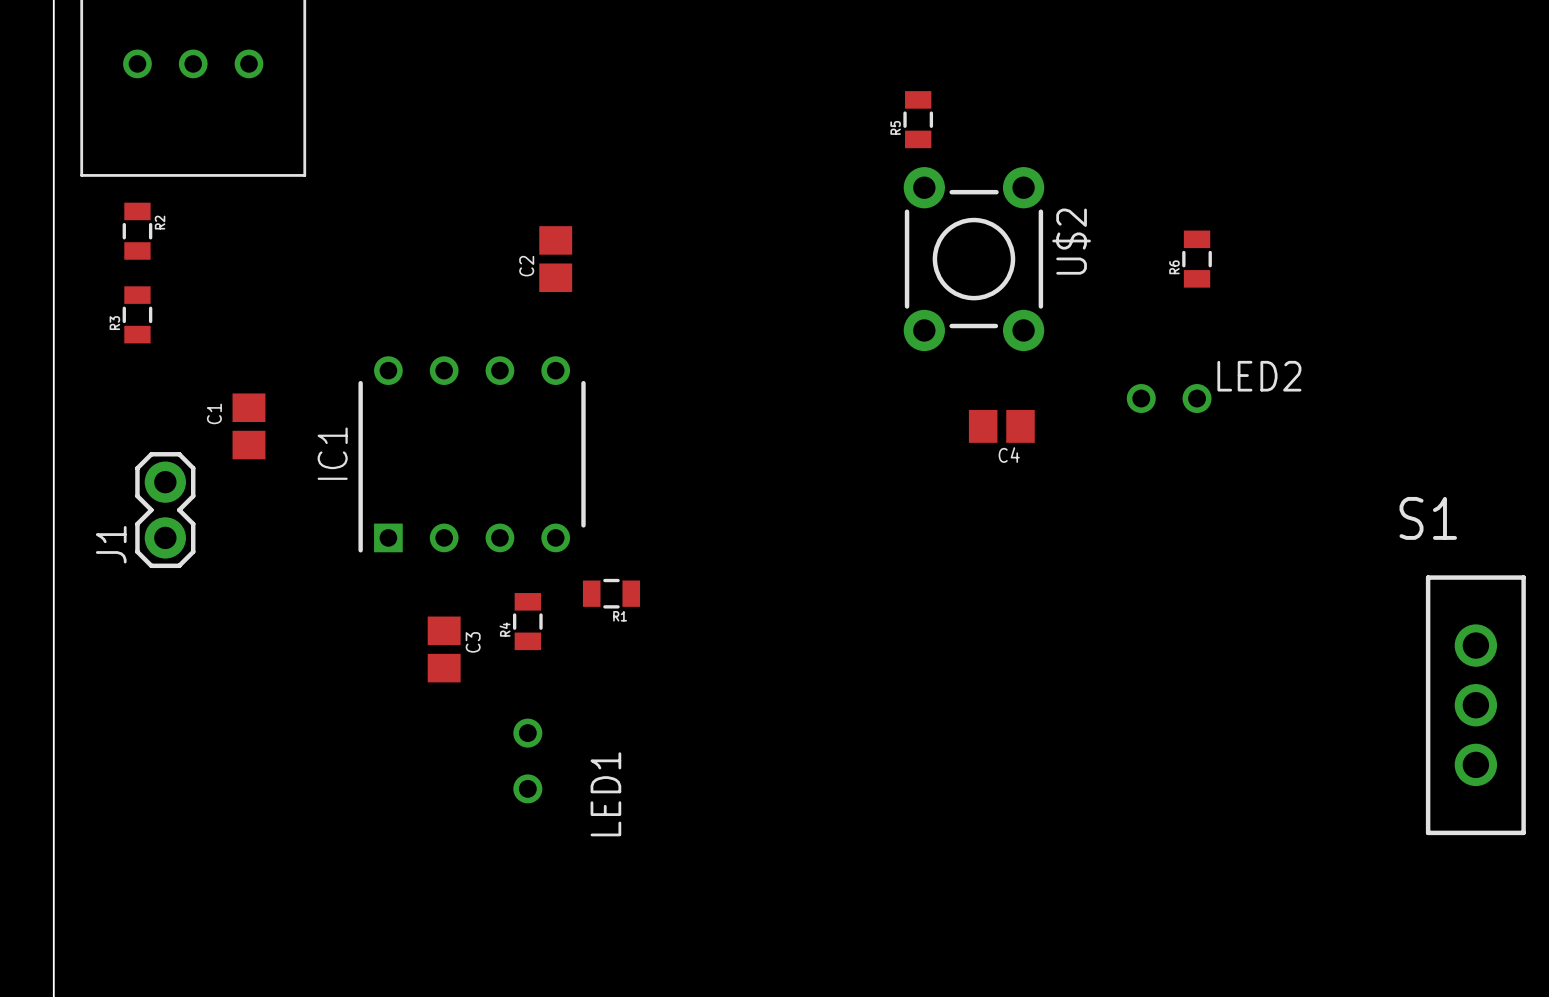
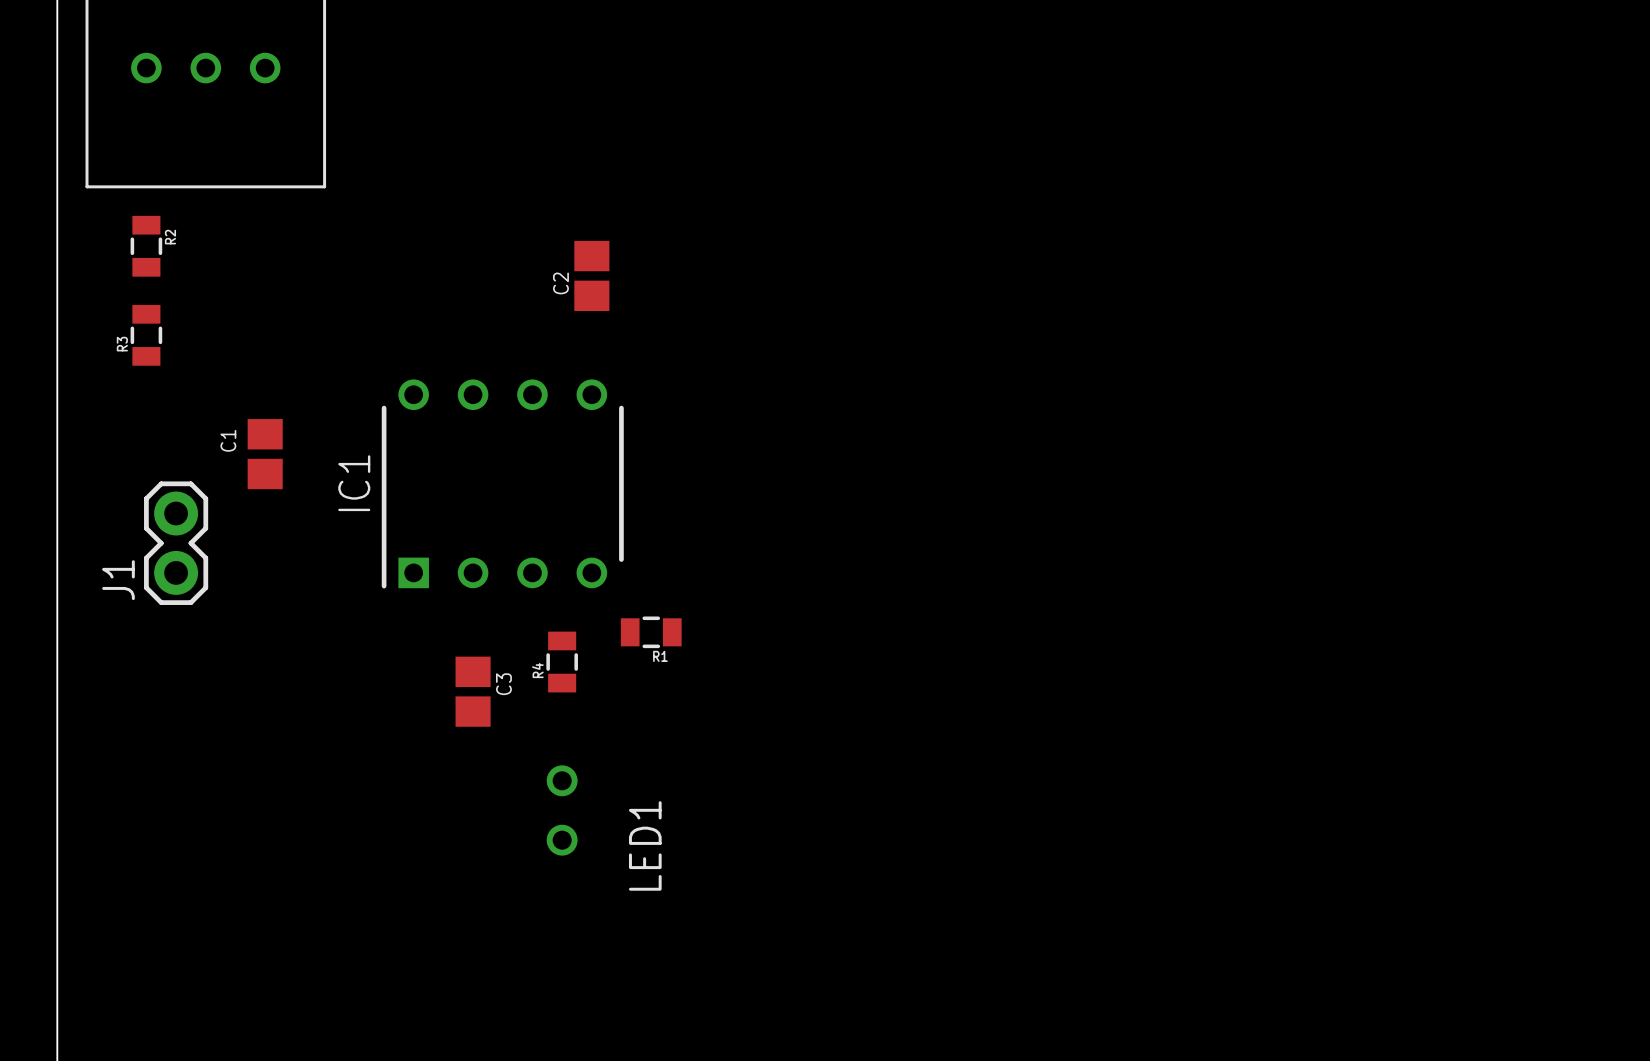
R5: (918, 119) -> none
U$2: (973, 259) -> none
R6: (1197, 259) -> none
LED2: (1169, 398) -> none
C4: (1001, 426) -> none
S1: (1475, 705) -> none

